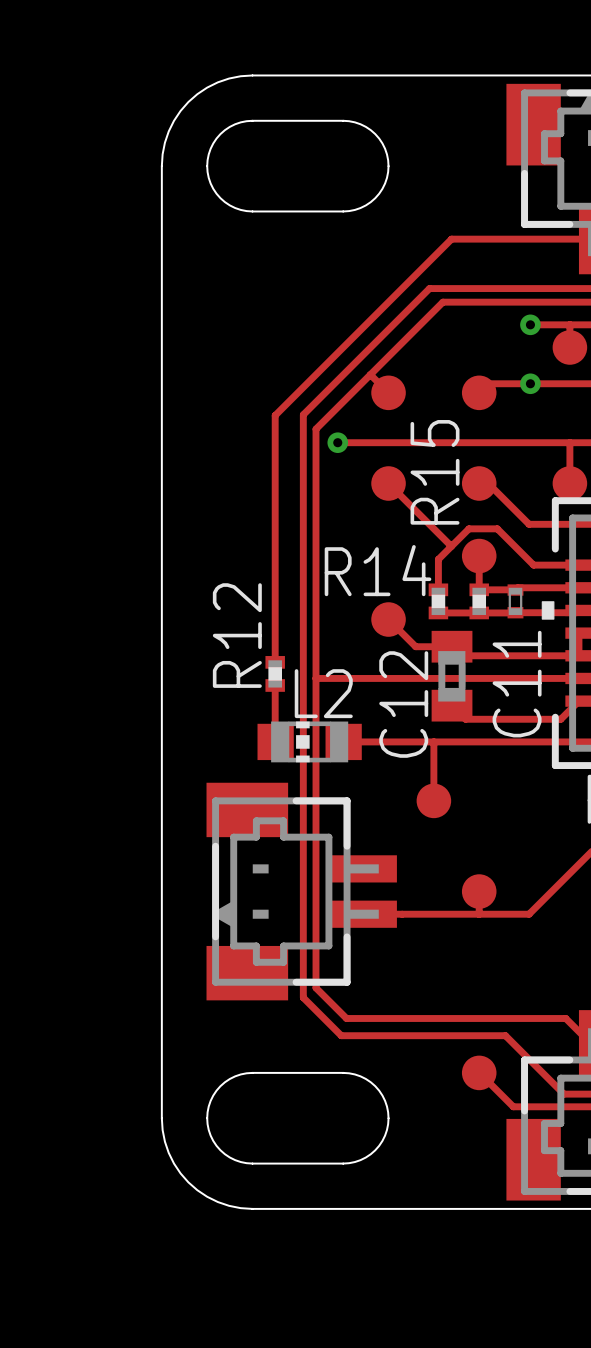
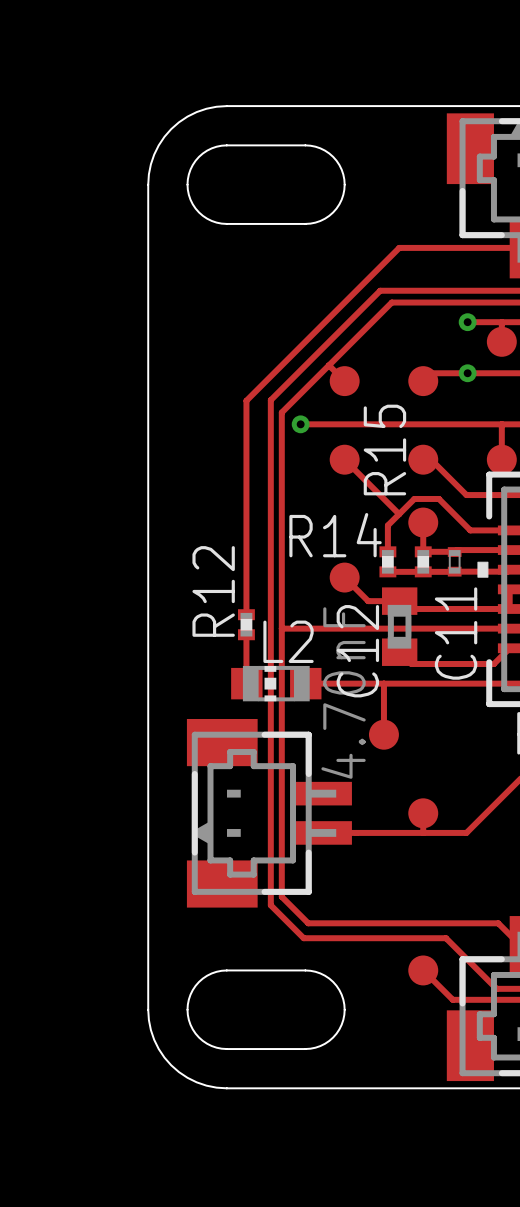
C12 value: none -> 4.70nF (343, 693)

